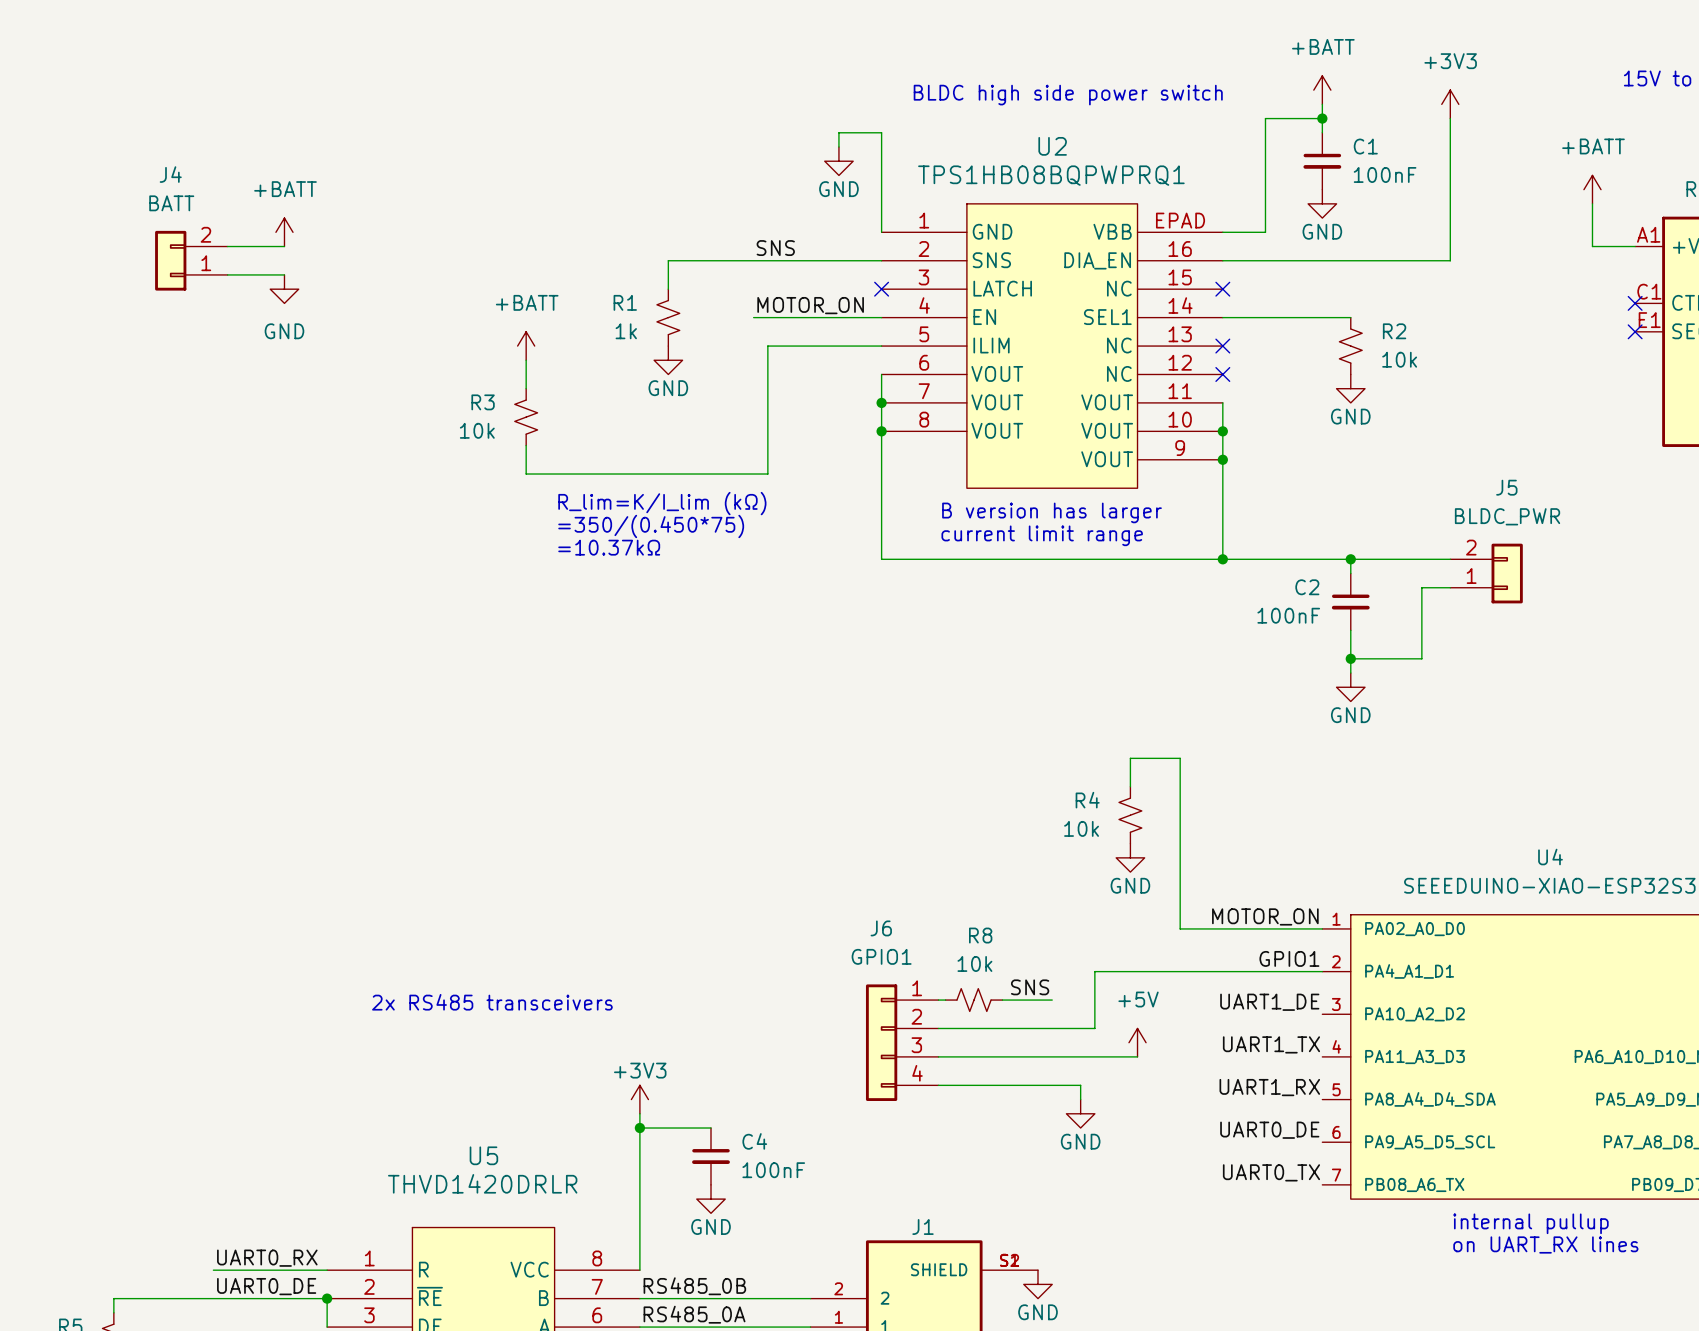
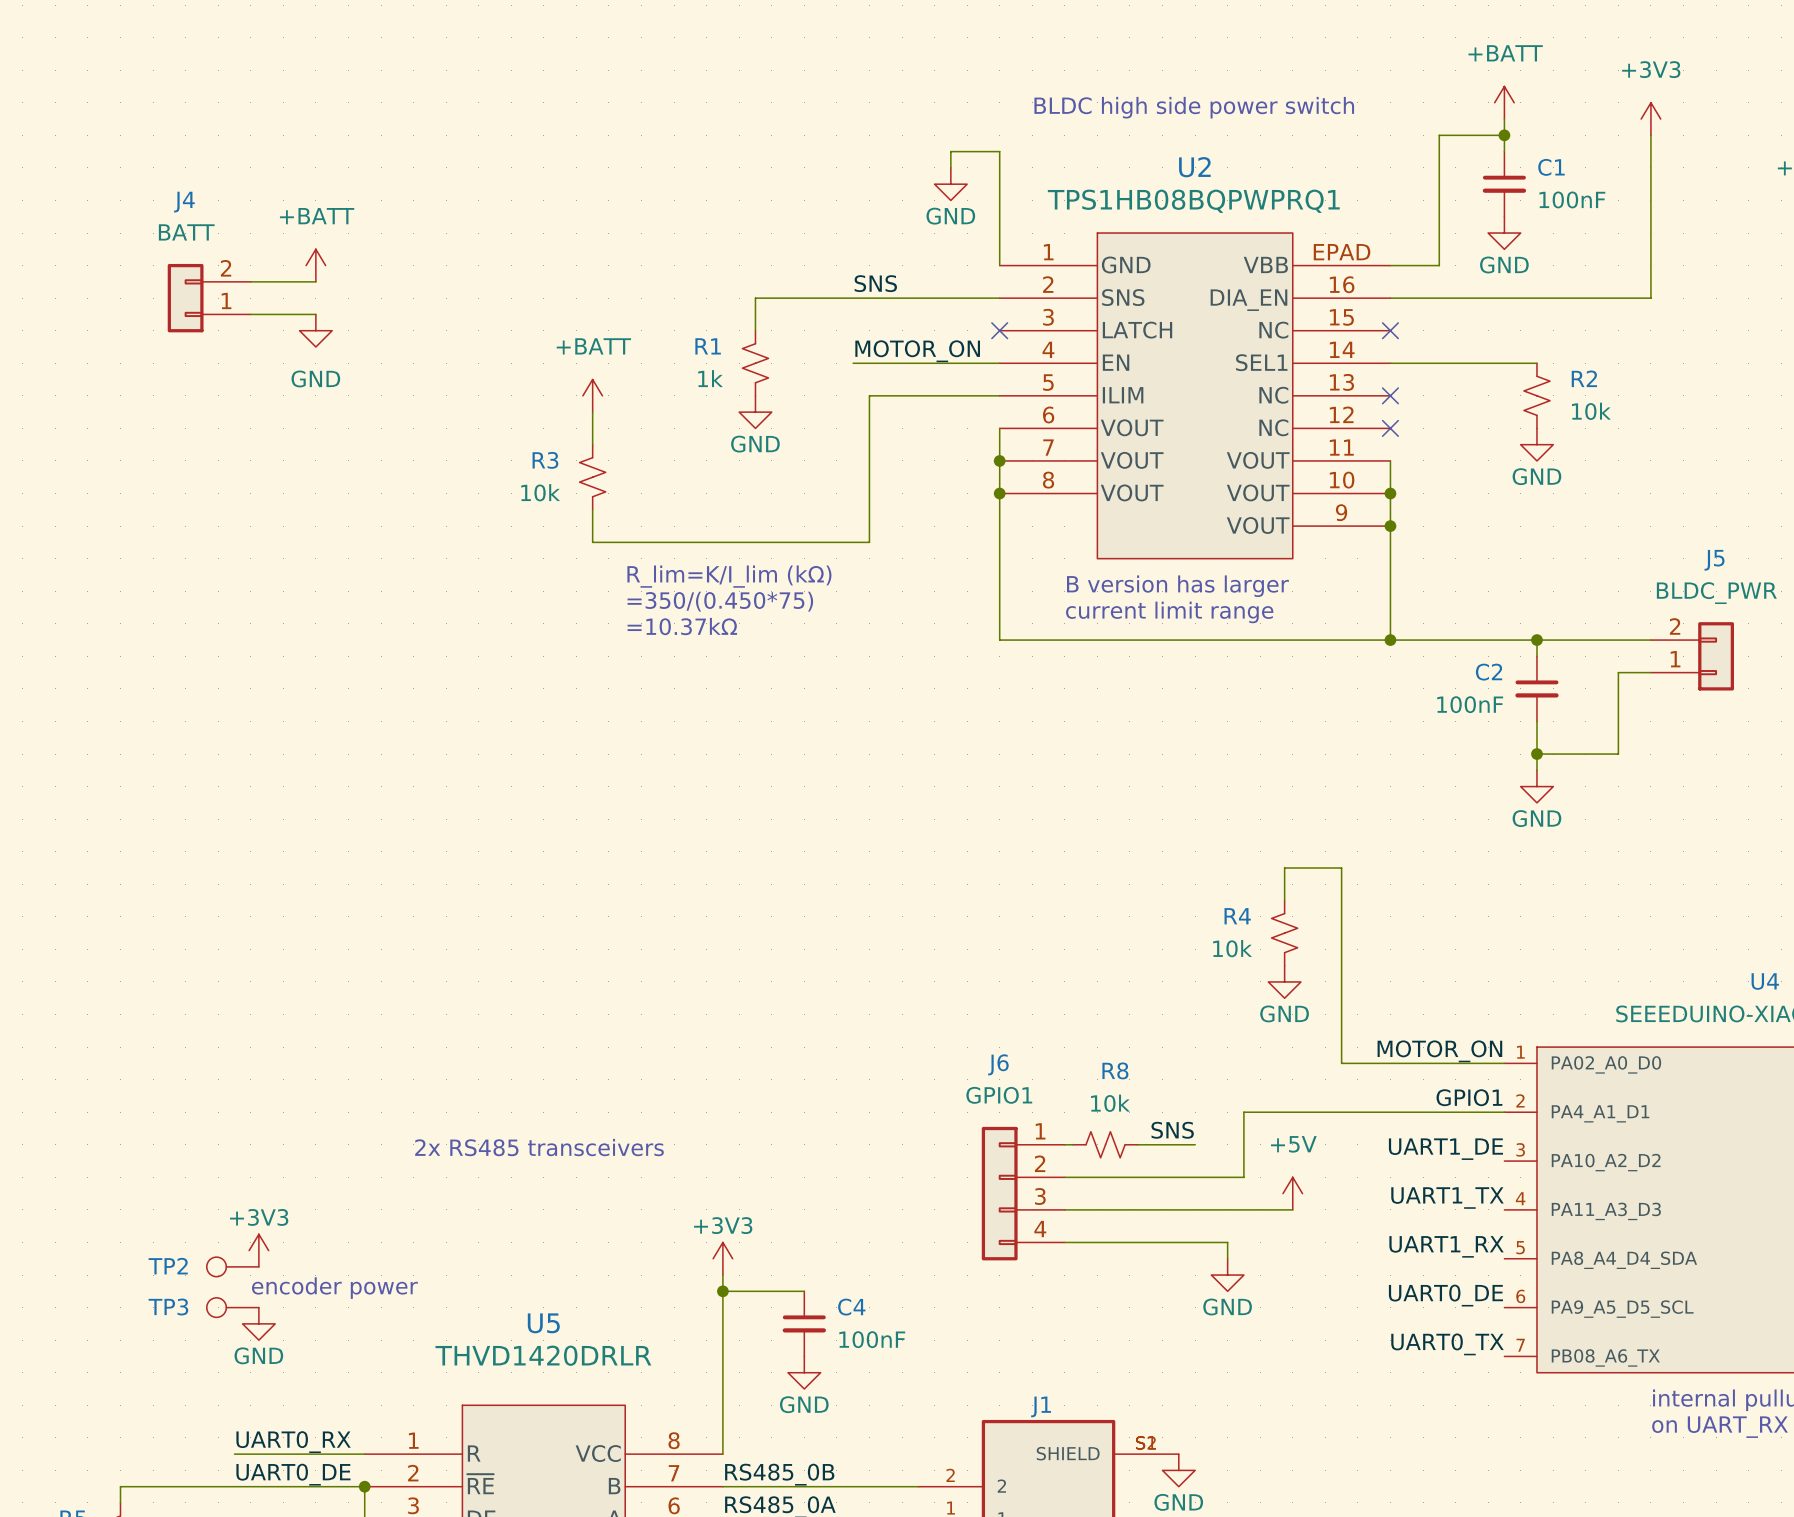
power symbol: none -> +3V3 (258, 1250)
TP2: none -> (232, 1266)
text: none -> encoder power (334, 1288)
TP3: none -> (232, 1307)
power symbol: none -> GND (258, 1323)

